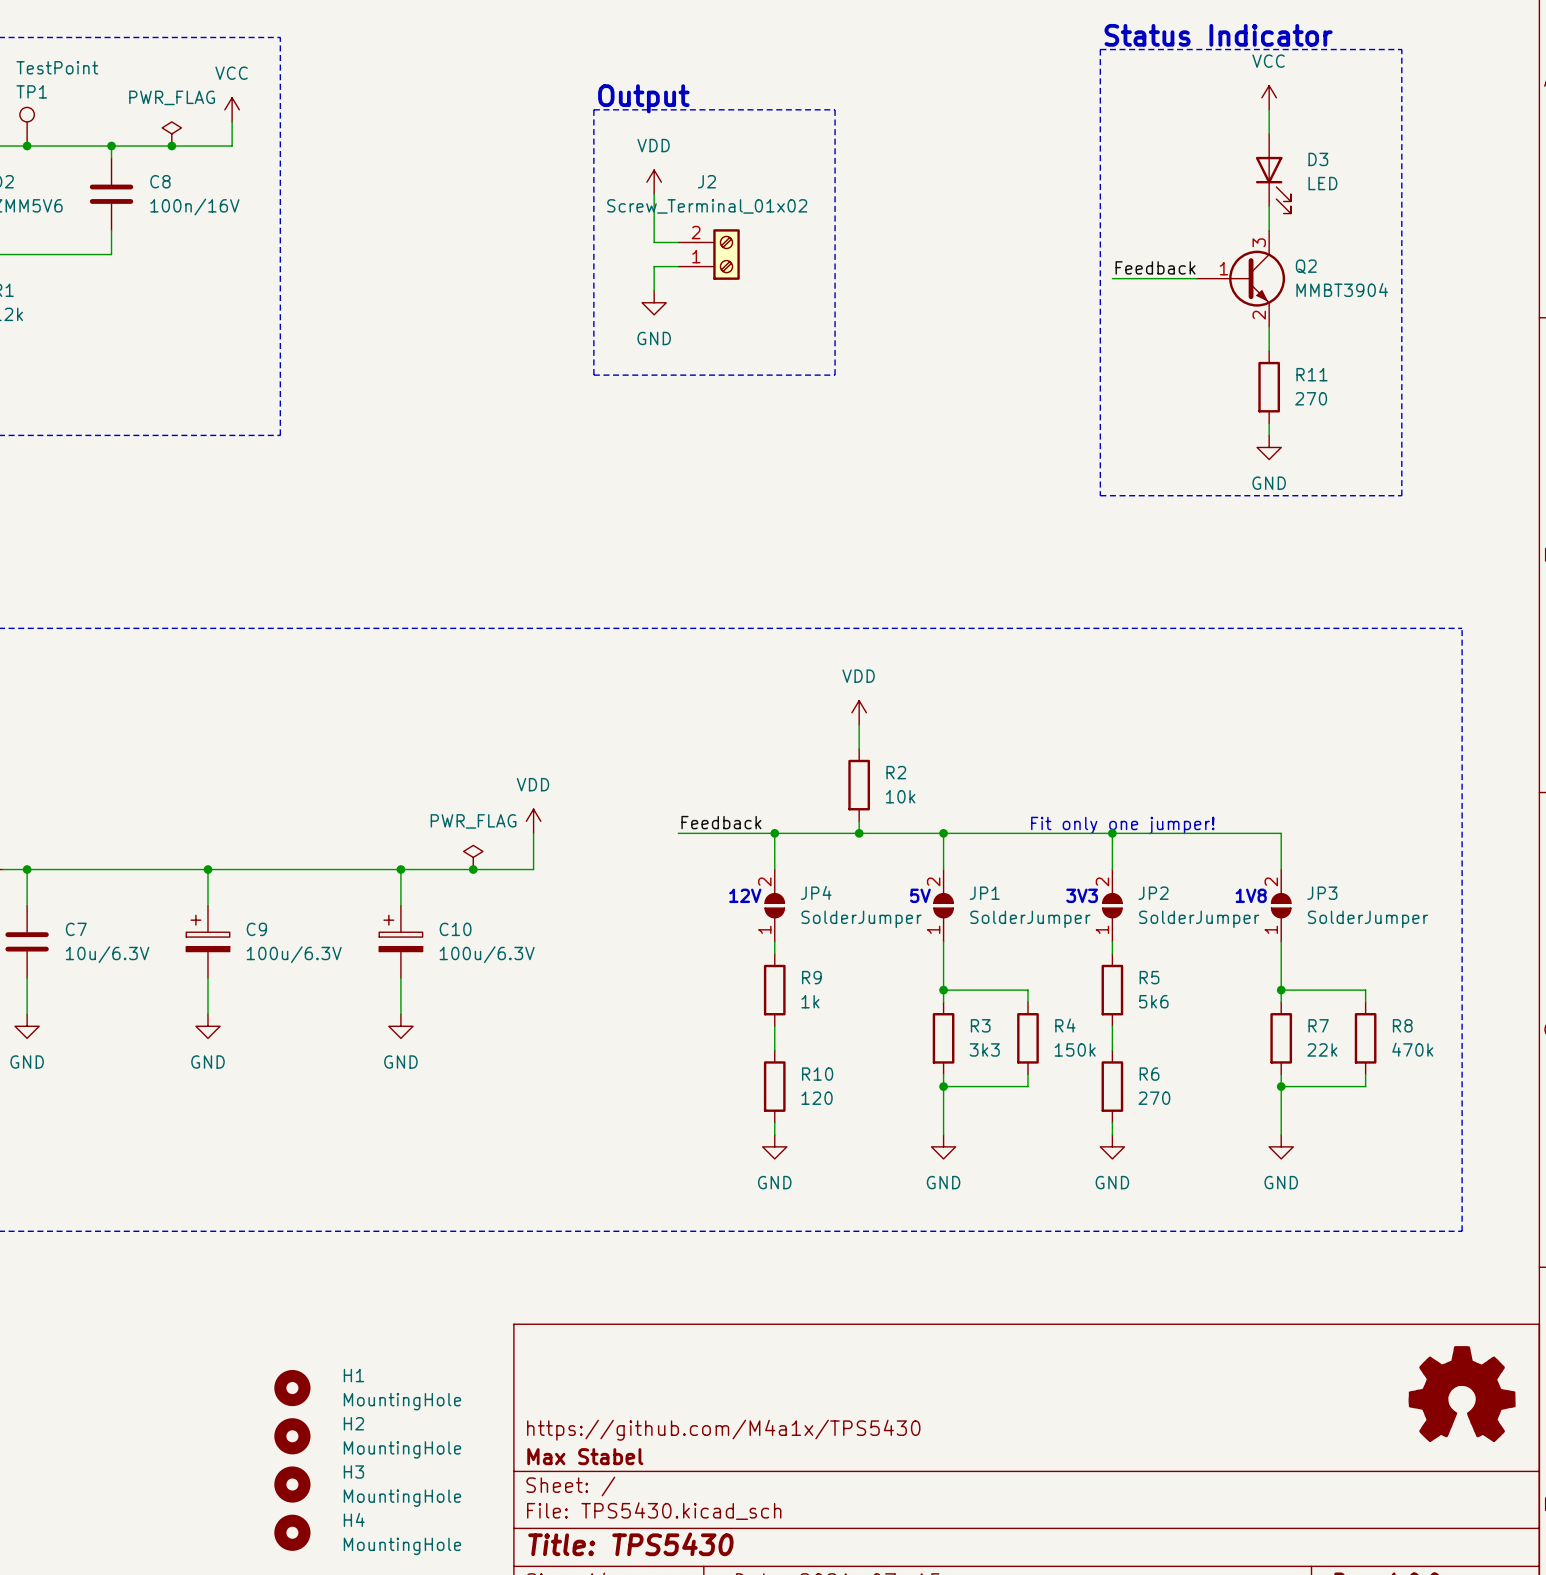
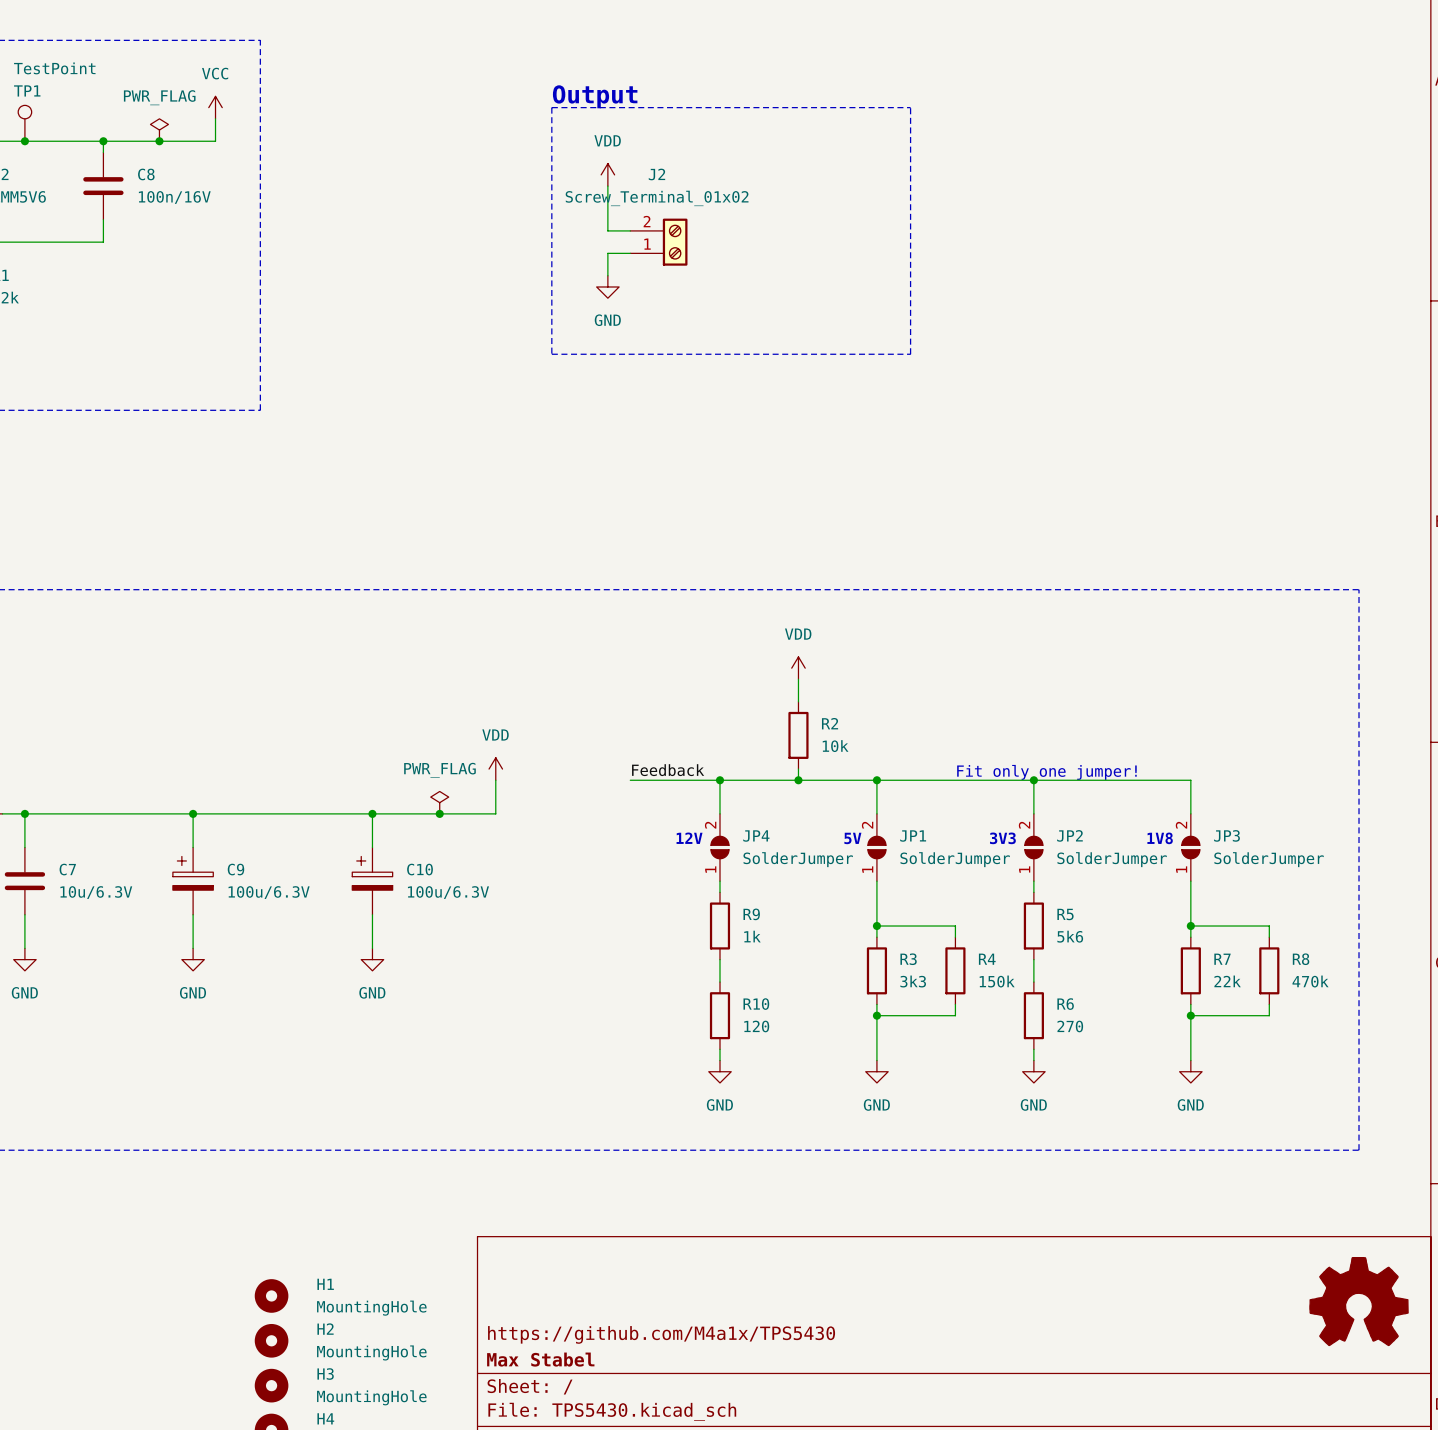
text: Status Indicator (1218, 35) -> none
line: (1100, 49) (1100, 495) (1401, 495) (1401, 49) (1100, 49) -> none
power symbol: VCC (1269, 97) -> none
line: (835, 109) (835, 375) -> (776, 107) (910, 107) (910, 354) (776, 354)
wire: (1269, 109) (1269, 133) -> none
D3: LED (1273, 173) -> none
wire: (1269, 206) (1269, 230) -> none
label: Feedback (1155, 267) -> none
wire: (1112, 278) (1196, 278) -> none
Q2: MMBT3904 (1240, 278) -> none
wire: (1269, 326) (1269, 351) -> none
R11: 270 (1269, 387) -> none
wire: (1269, 423) (1269, 435) -> none
power symbol: GND (1269, 447) -> none

